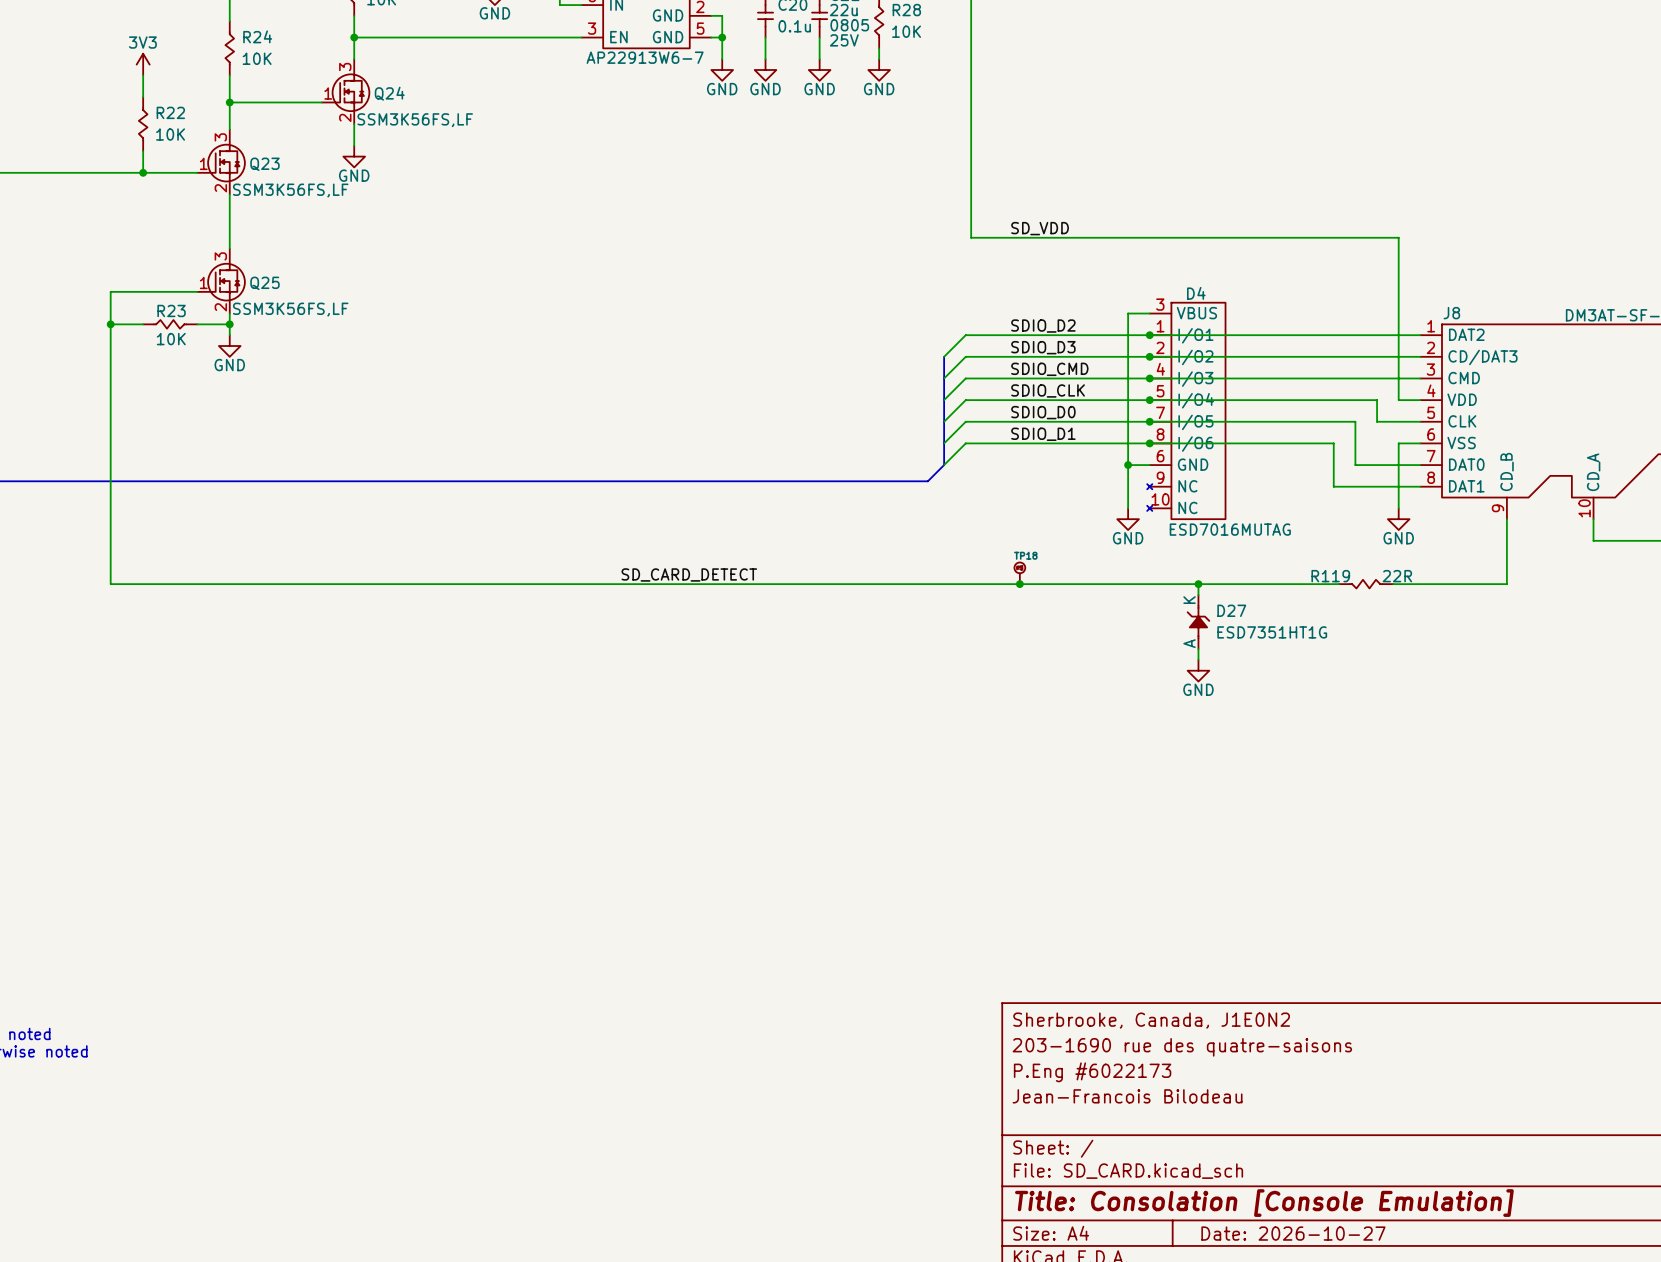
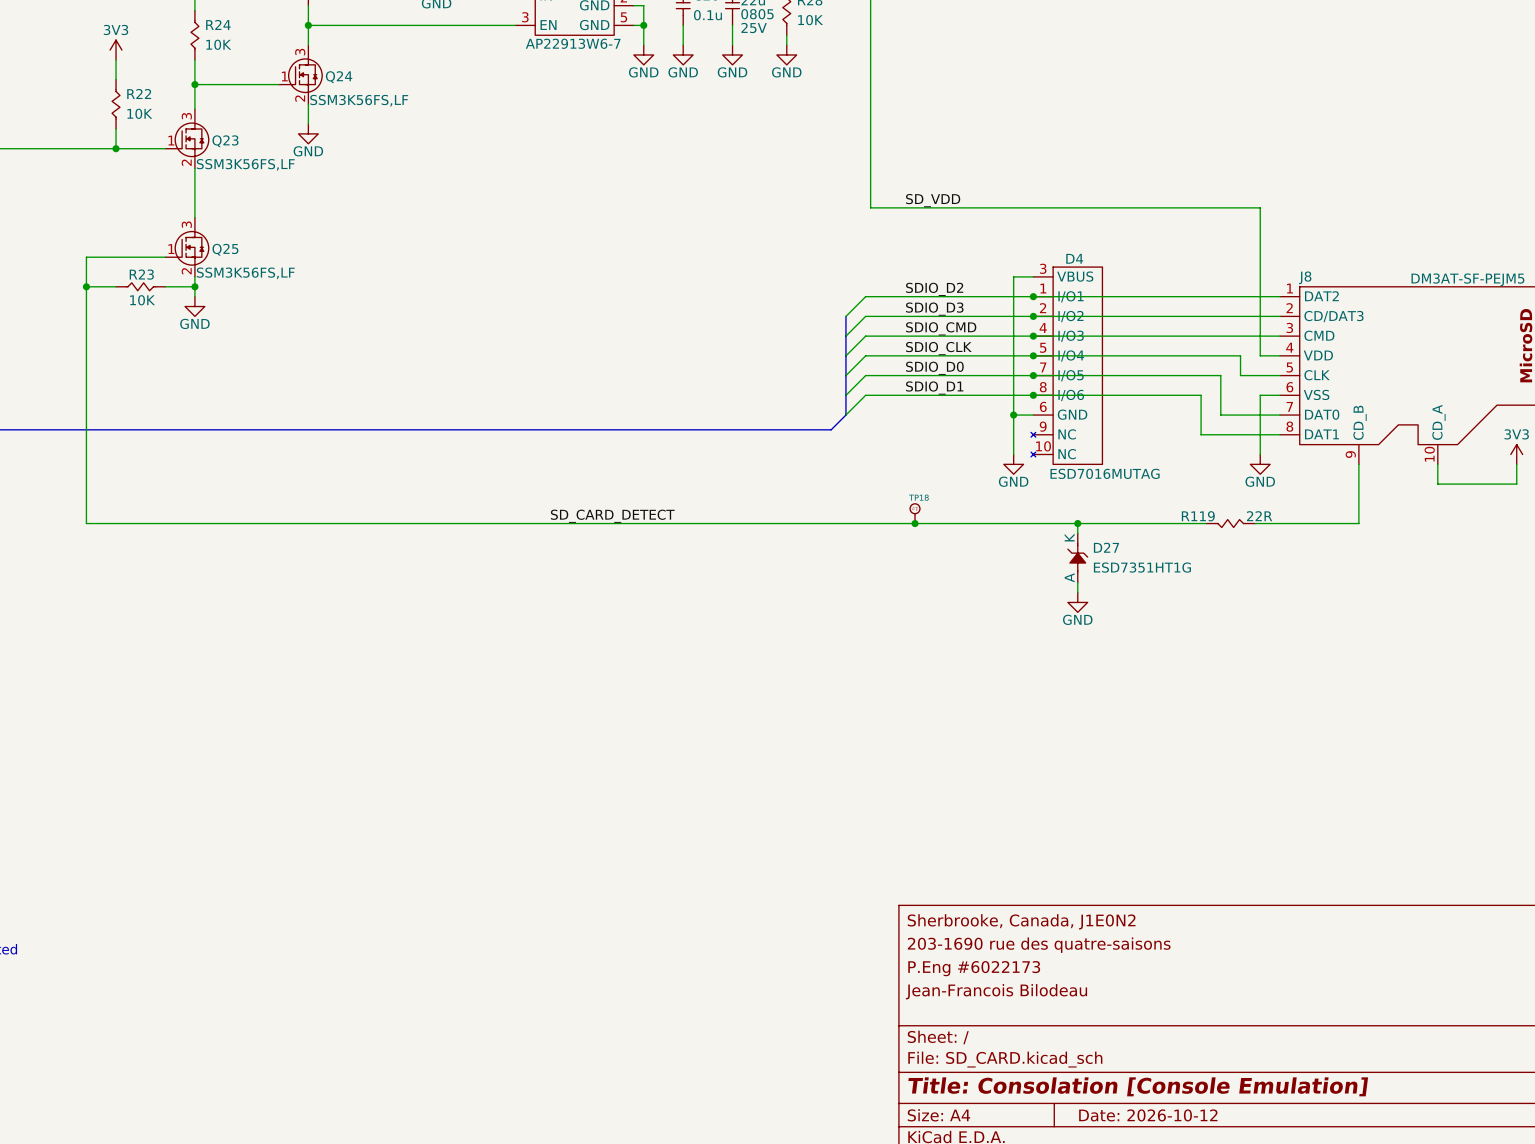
title block: Date: 2026-10-27 (1293, 1233) -> Date: 2026-10-12 (1148, 1115)

